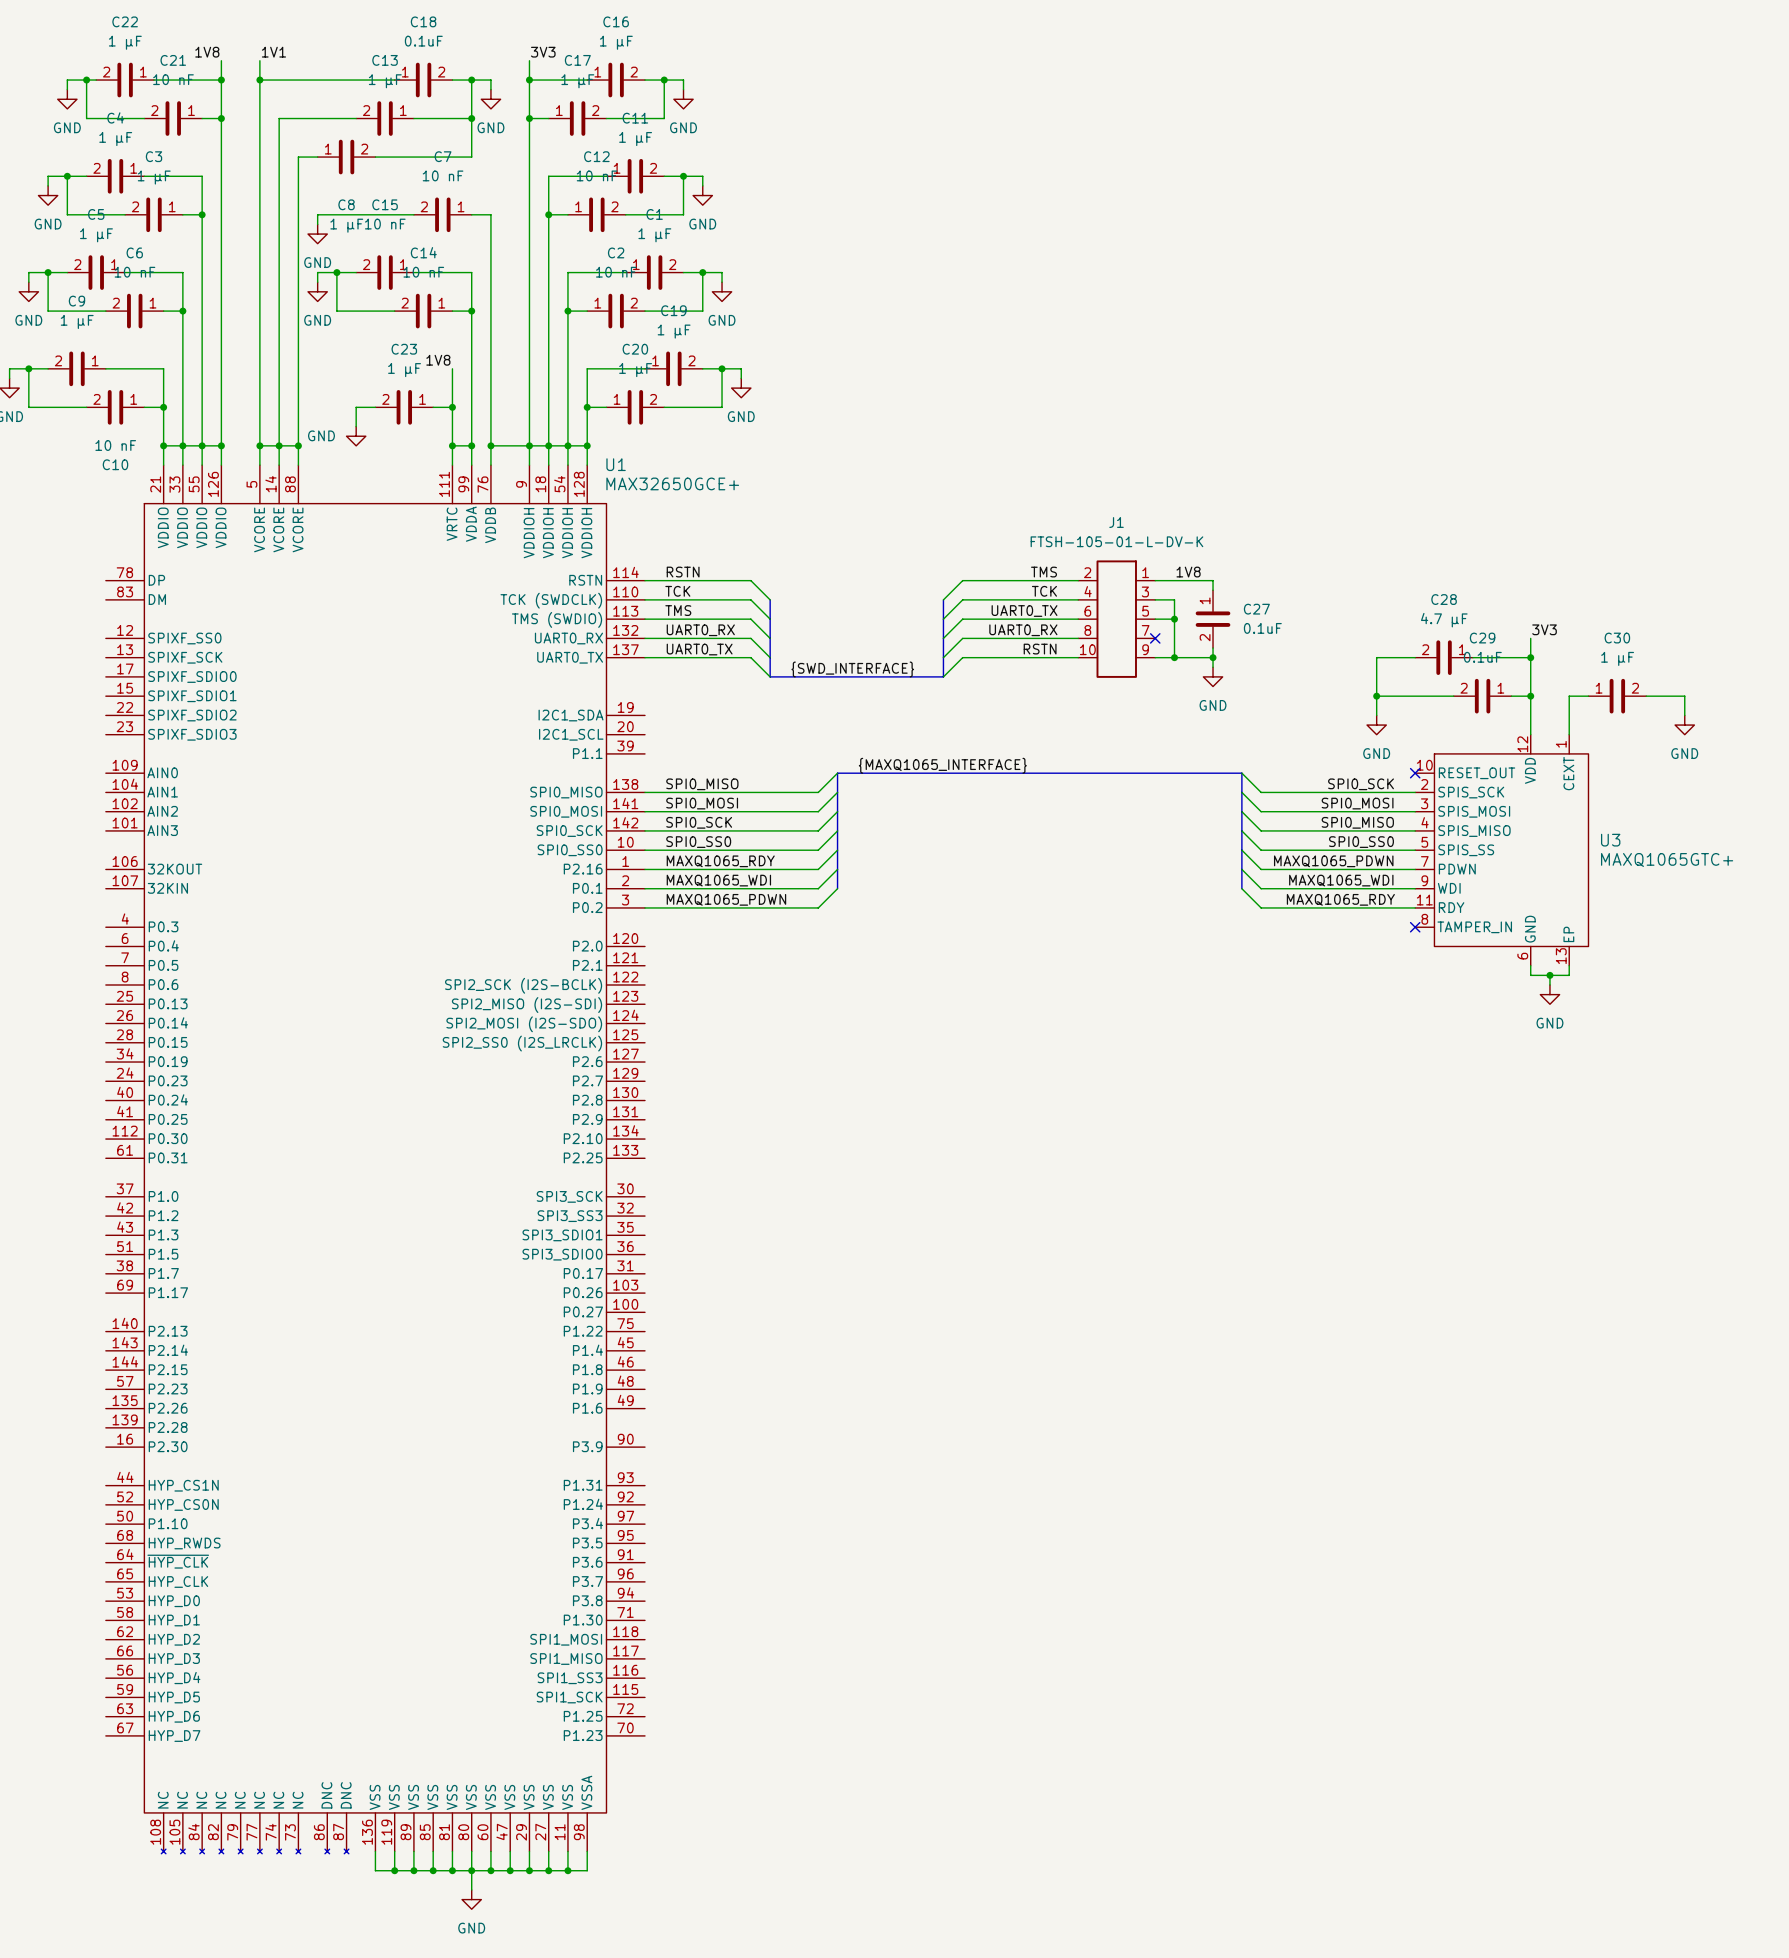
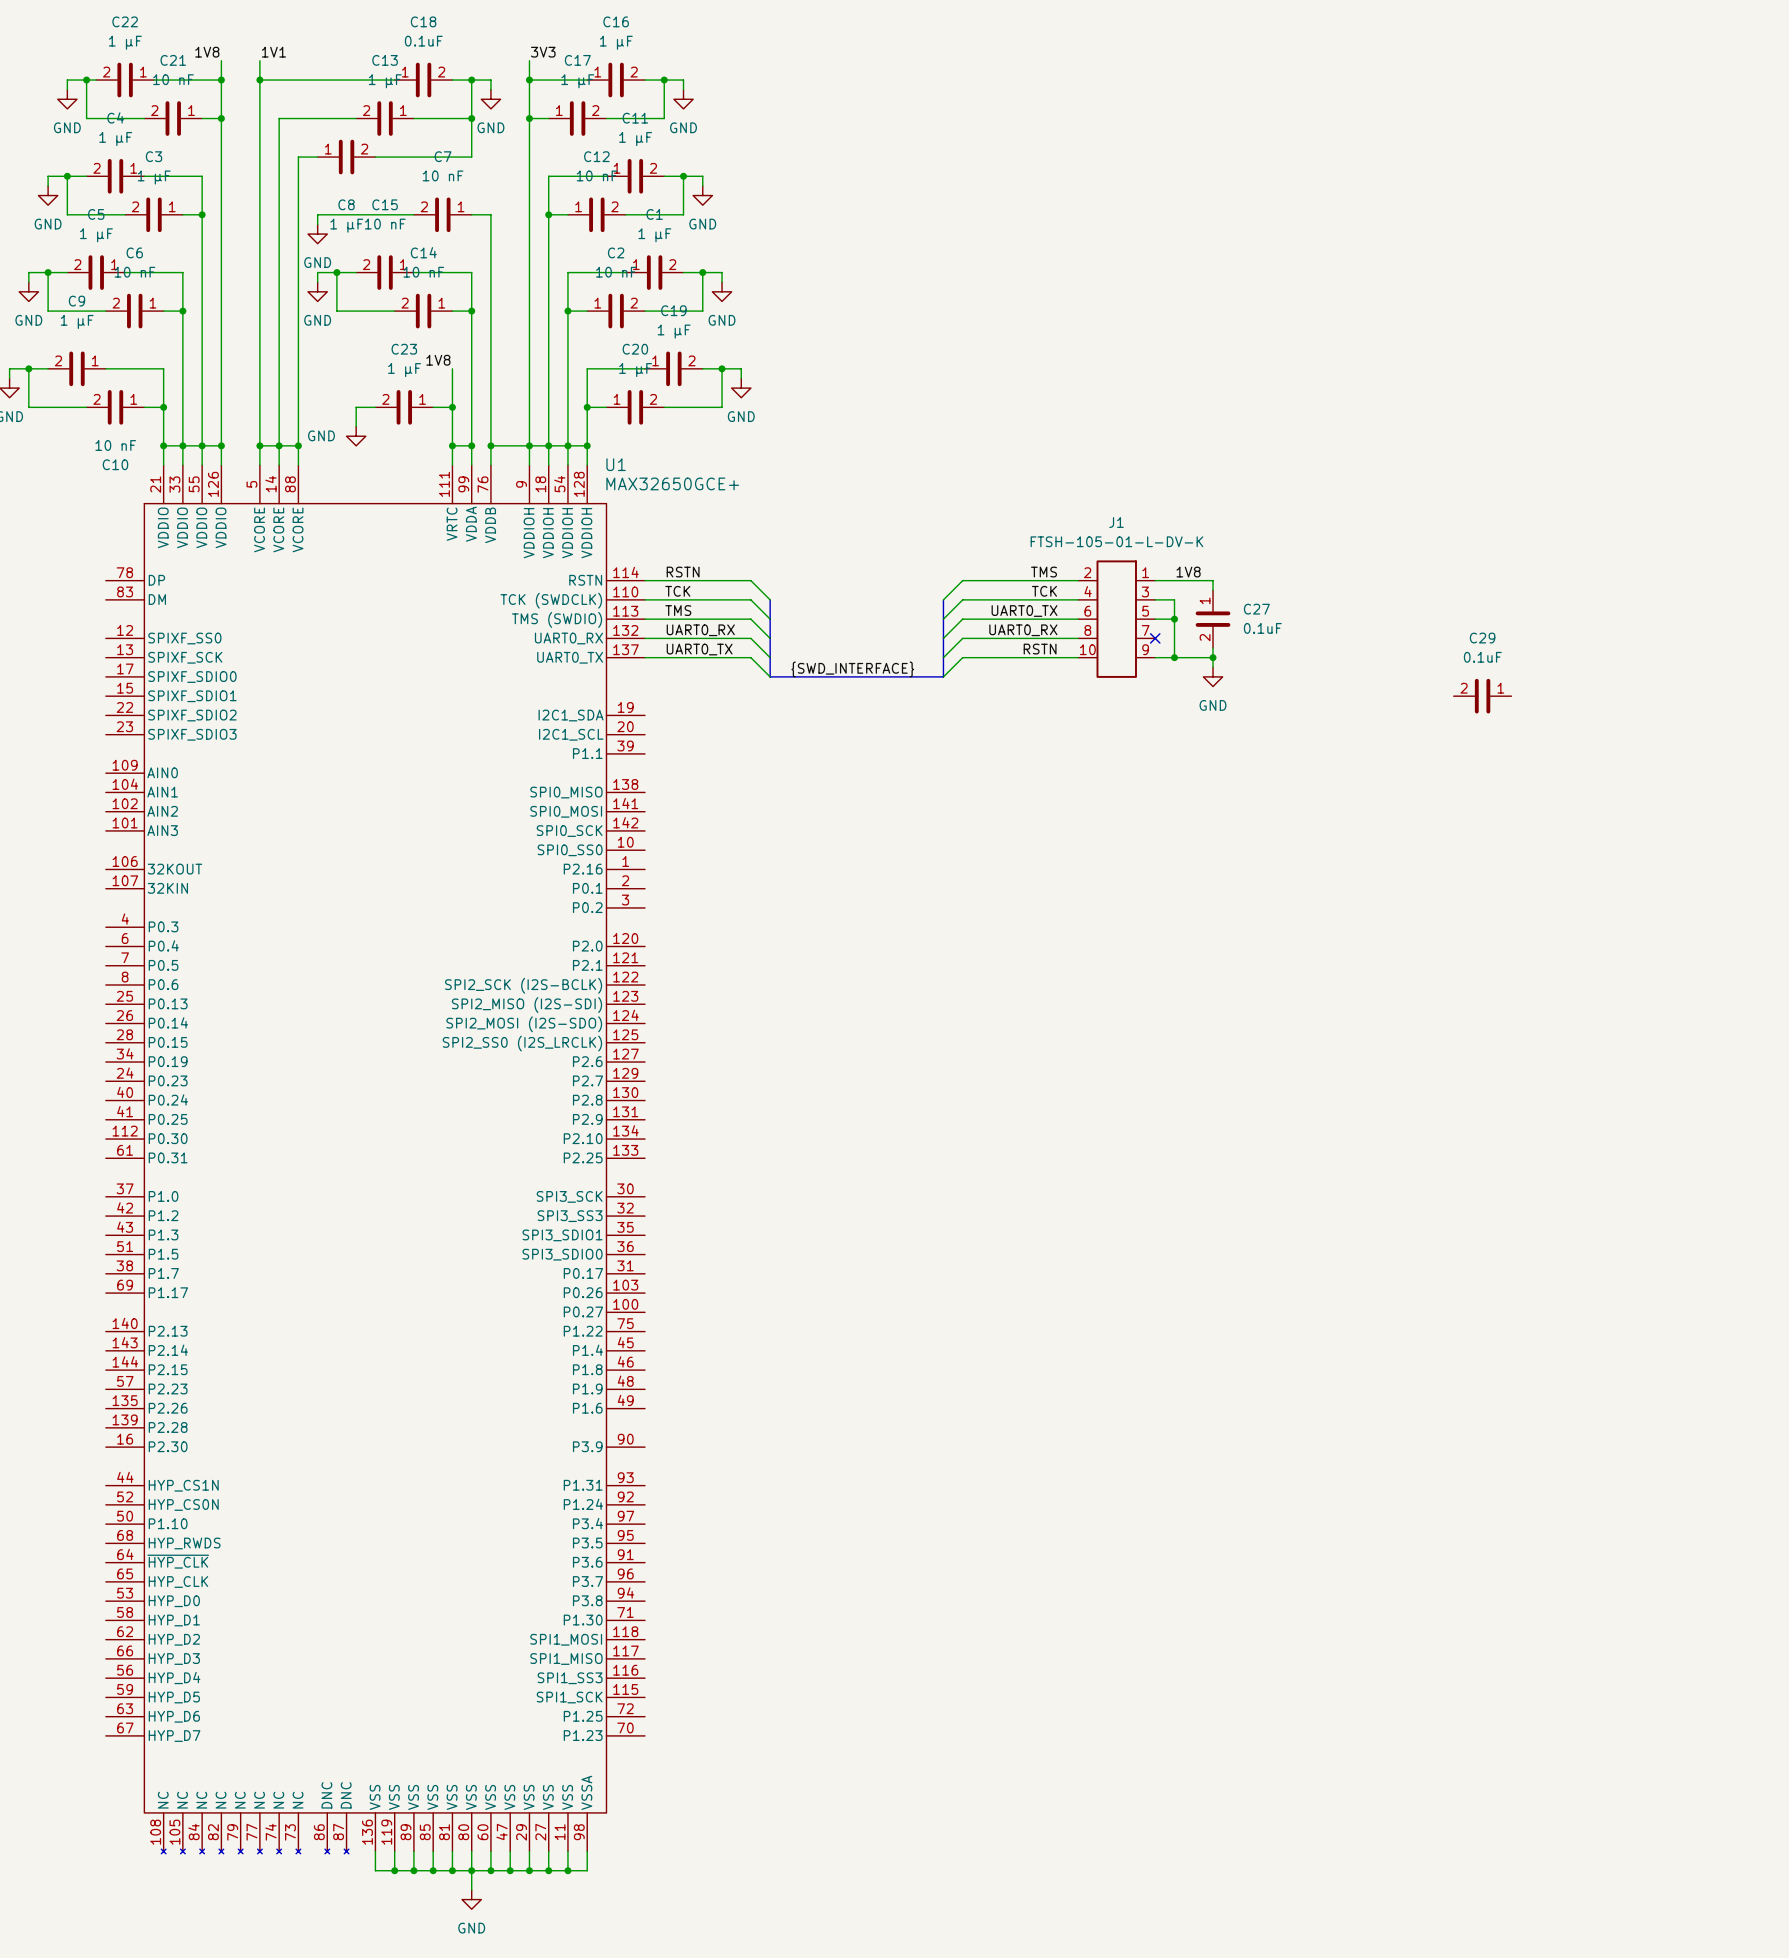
label: 3V3 (1544, 629) -> none
wire: (1530, 638) (1530, 734) -> none
wire: (1415, 657) (1376, 657) (1376, 715) -> none
C28: 4.7 µF (1444, 657) -> none
wire: (1472, 657) (1530, 657) -> none
junction: (1530, 657) -> none
wire: (1376, 696) (1453, 696) -> none
junction: (1376, 696) -> none
wire: (1511, 696) (1530, 696) -> none
junction: (1530, 696) -> none
wire: (1588, 696) (1569, 696) (1569, 734) -> none
C30: 1 µF (1617, 696) -> none
wire: (1646, 696) (1684, 696) (1684, 715) -> none
power symbol: GND (1376, 725) -> none
power symbol: GND (1684, 725) -> none
label: {MAXQ1065_INTERFACE} (942, 765) -> none
wire: (837, 773) (818, 792) (644, 792) -> none
wire: (1241, 773) (1261, 792) (1415, 792) -> none
no-connect mark: (1415, 773) -> none
label: SPI0_MISO (702, 784) -> none
label: SPI0_SCK (1361, 784) -> none
wire: (837, 792) (818, 811) (644, 811) -> none
wire: (1241, 792) (1261, 811) (1415, 811) -> none
label: SPI0_MOSI (702, 803) -> none
label: SPI0_MOSI (1357, 803) -> none
wire: (837, 811) (818, 830) (644, 830) -> none
wire: (1241, 811) (1261, 830) (1415, 830) -> none
label: SPI0_SCK (699, 822) -> none
label: SPI0_MISO (1357, 822) -> none
wire: (837, 830) (818, 850) (644, 850) -> none
wire: (1241, 830) (1261, 850) (1415, 850) -> none
label: SPI0_SS0 (698, 842) -> none
label: SPI0_SS0 (1361, 842) -> none
wire: (837, 850) (818, 869) (644, 869) -> none
wire: (1241, 850) (1261, 869) (1415, 869) -> none
U3: MAXQ1065GTC+ (1501, 850) -> none
label: MAXQ1065_RDY (720, 861) -> none
label: MAXQ1065_PDWN (1333, 861) -> none
wire: (837, 869) (818, 888) (644, 888) -> none
wire: (1241, 869) (1261, 888) (1415, 888) -> none
label: MAXQ1065_WDI (718, 880) -> none
label: MAXQ1065_WDI (1341, 880) -> none
wire: (837, 888) (818, 907) (644, 907) -> none
bus: (837, 888) (837, 773) (1241, 773) (1241, 888) -> none
wire: (1241, 888) (1261, 907) (1415, 907) -> none
label: MAXQ1065_PDWN (726, 899) -> none
label: MAXQ1065_RDY (1340, 899) -> none
no-connect mark: (1415, 927) -> none
wire: (1530, 965) (1530, 975) (1569, 975) (1569, 965) -> none
wire: (1549, 975) (1549, 984) -> none
junction: (1549, 975) -> none
power symbol: GND (1549, 994) -> none

